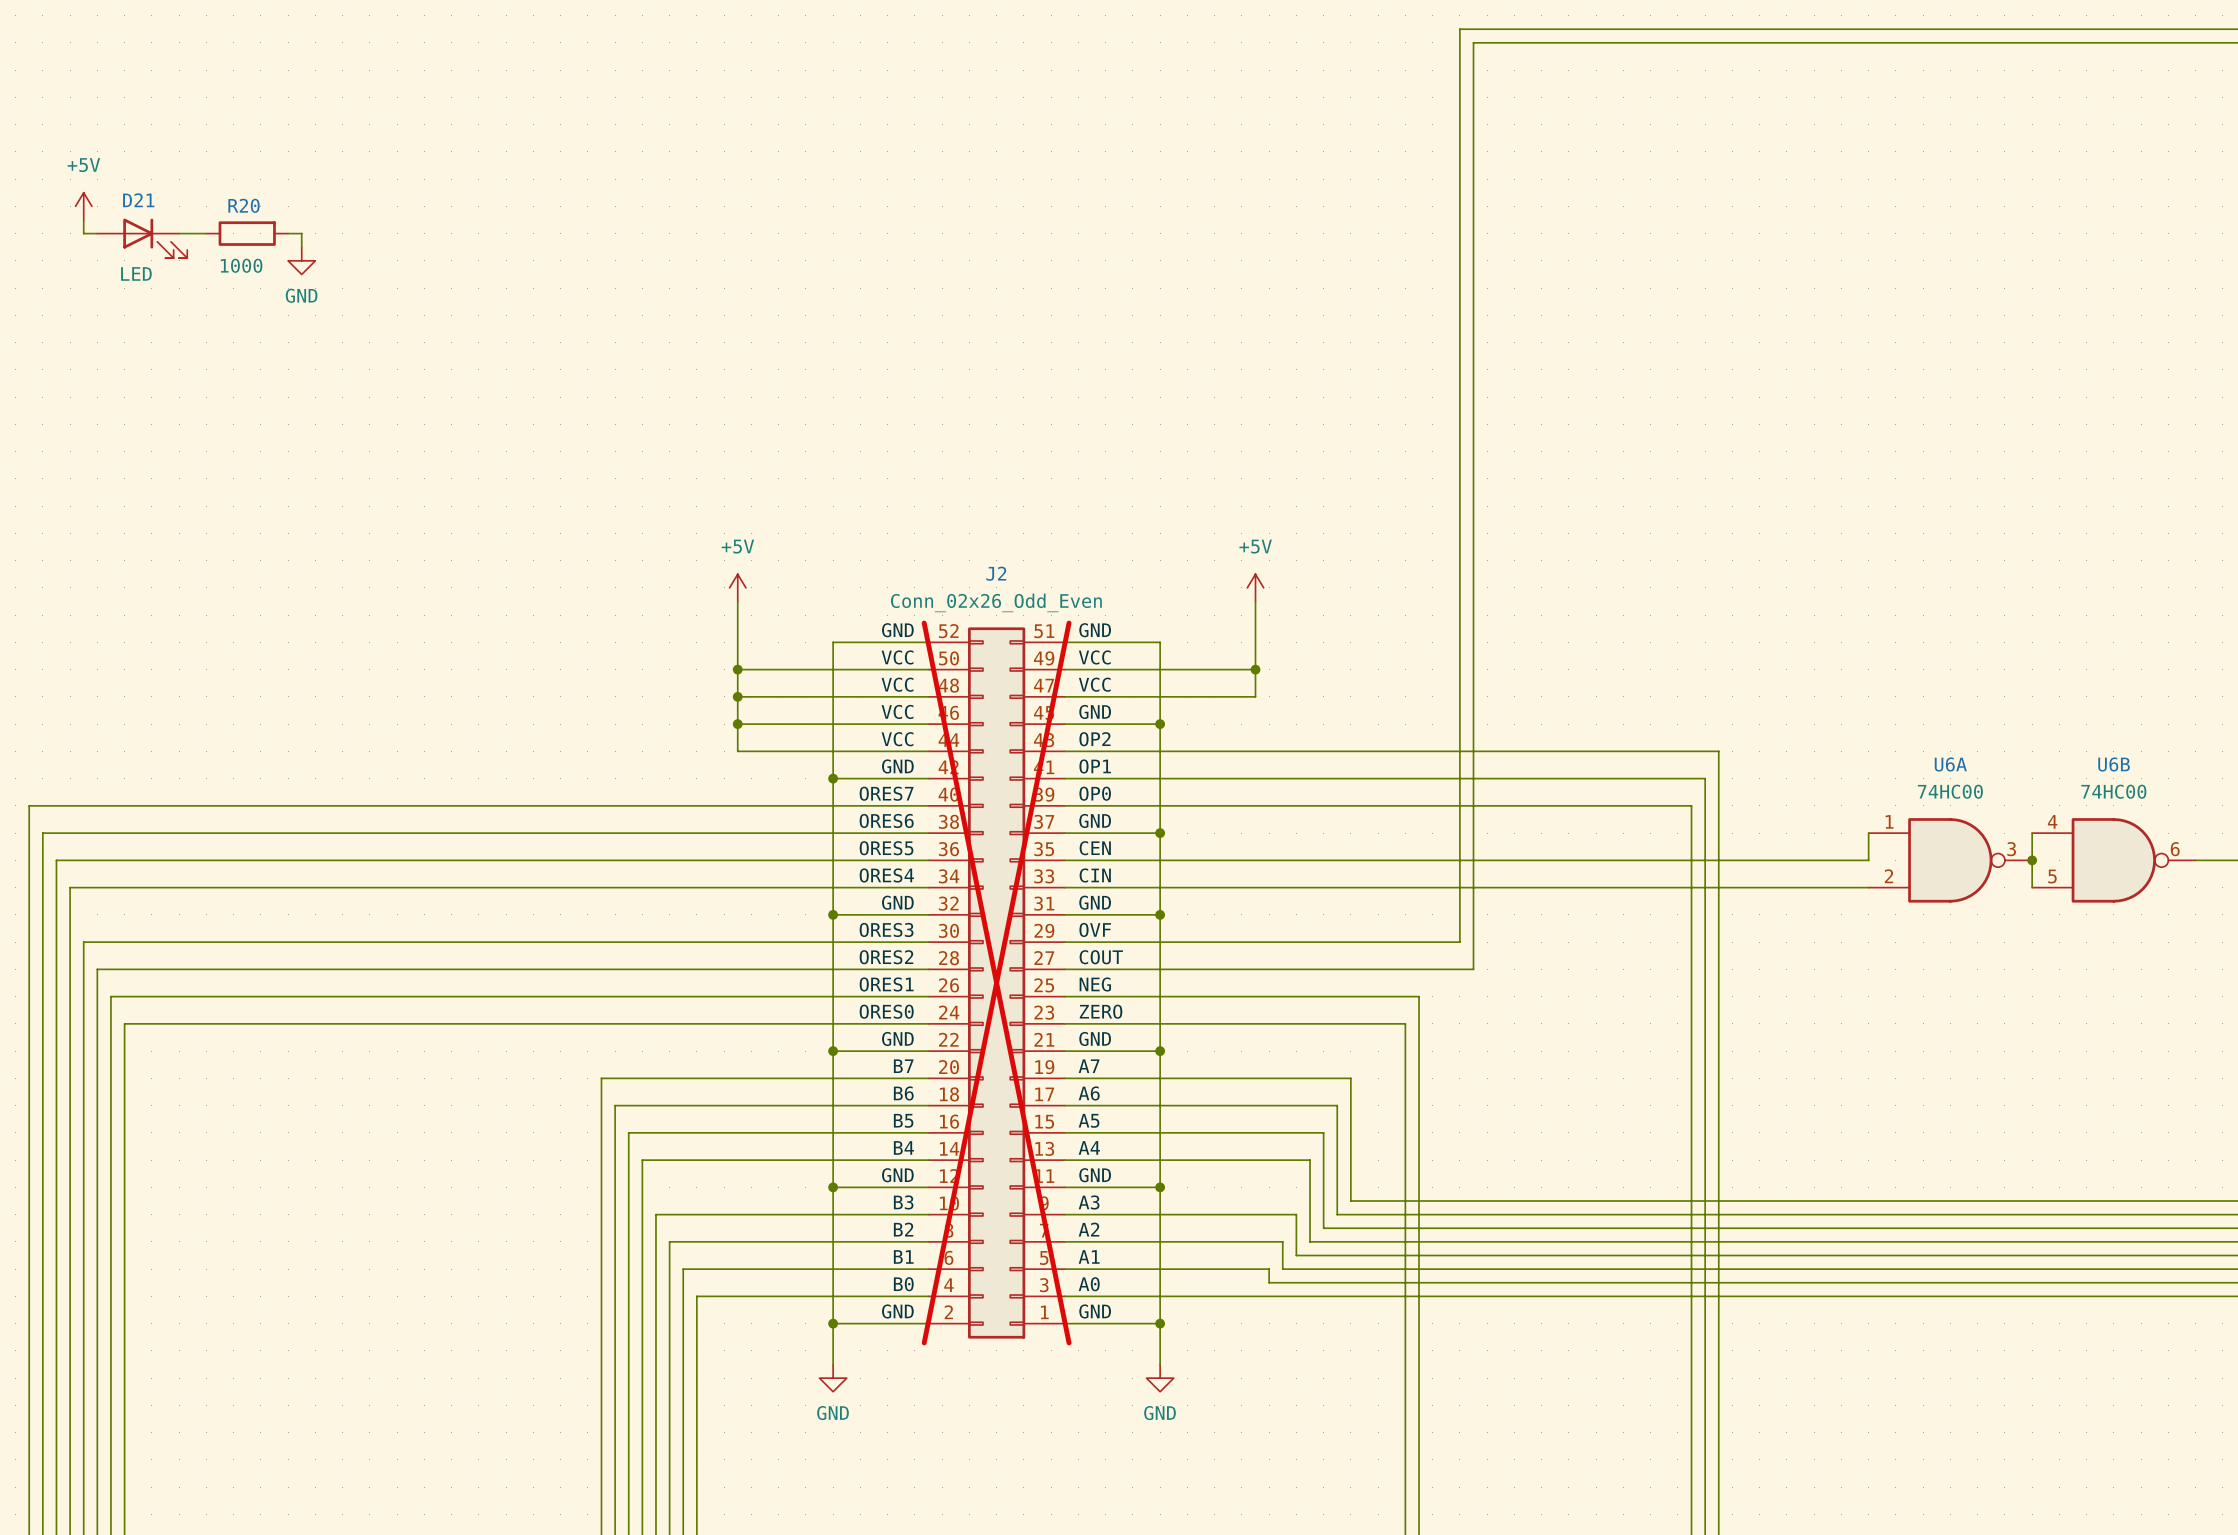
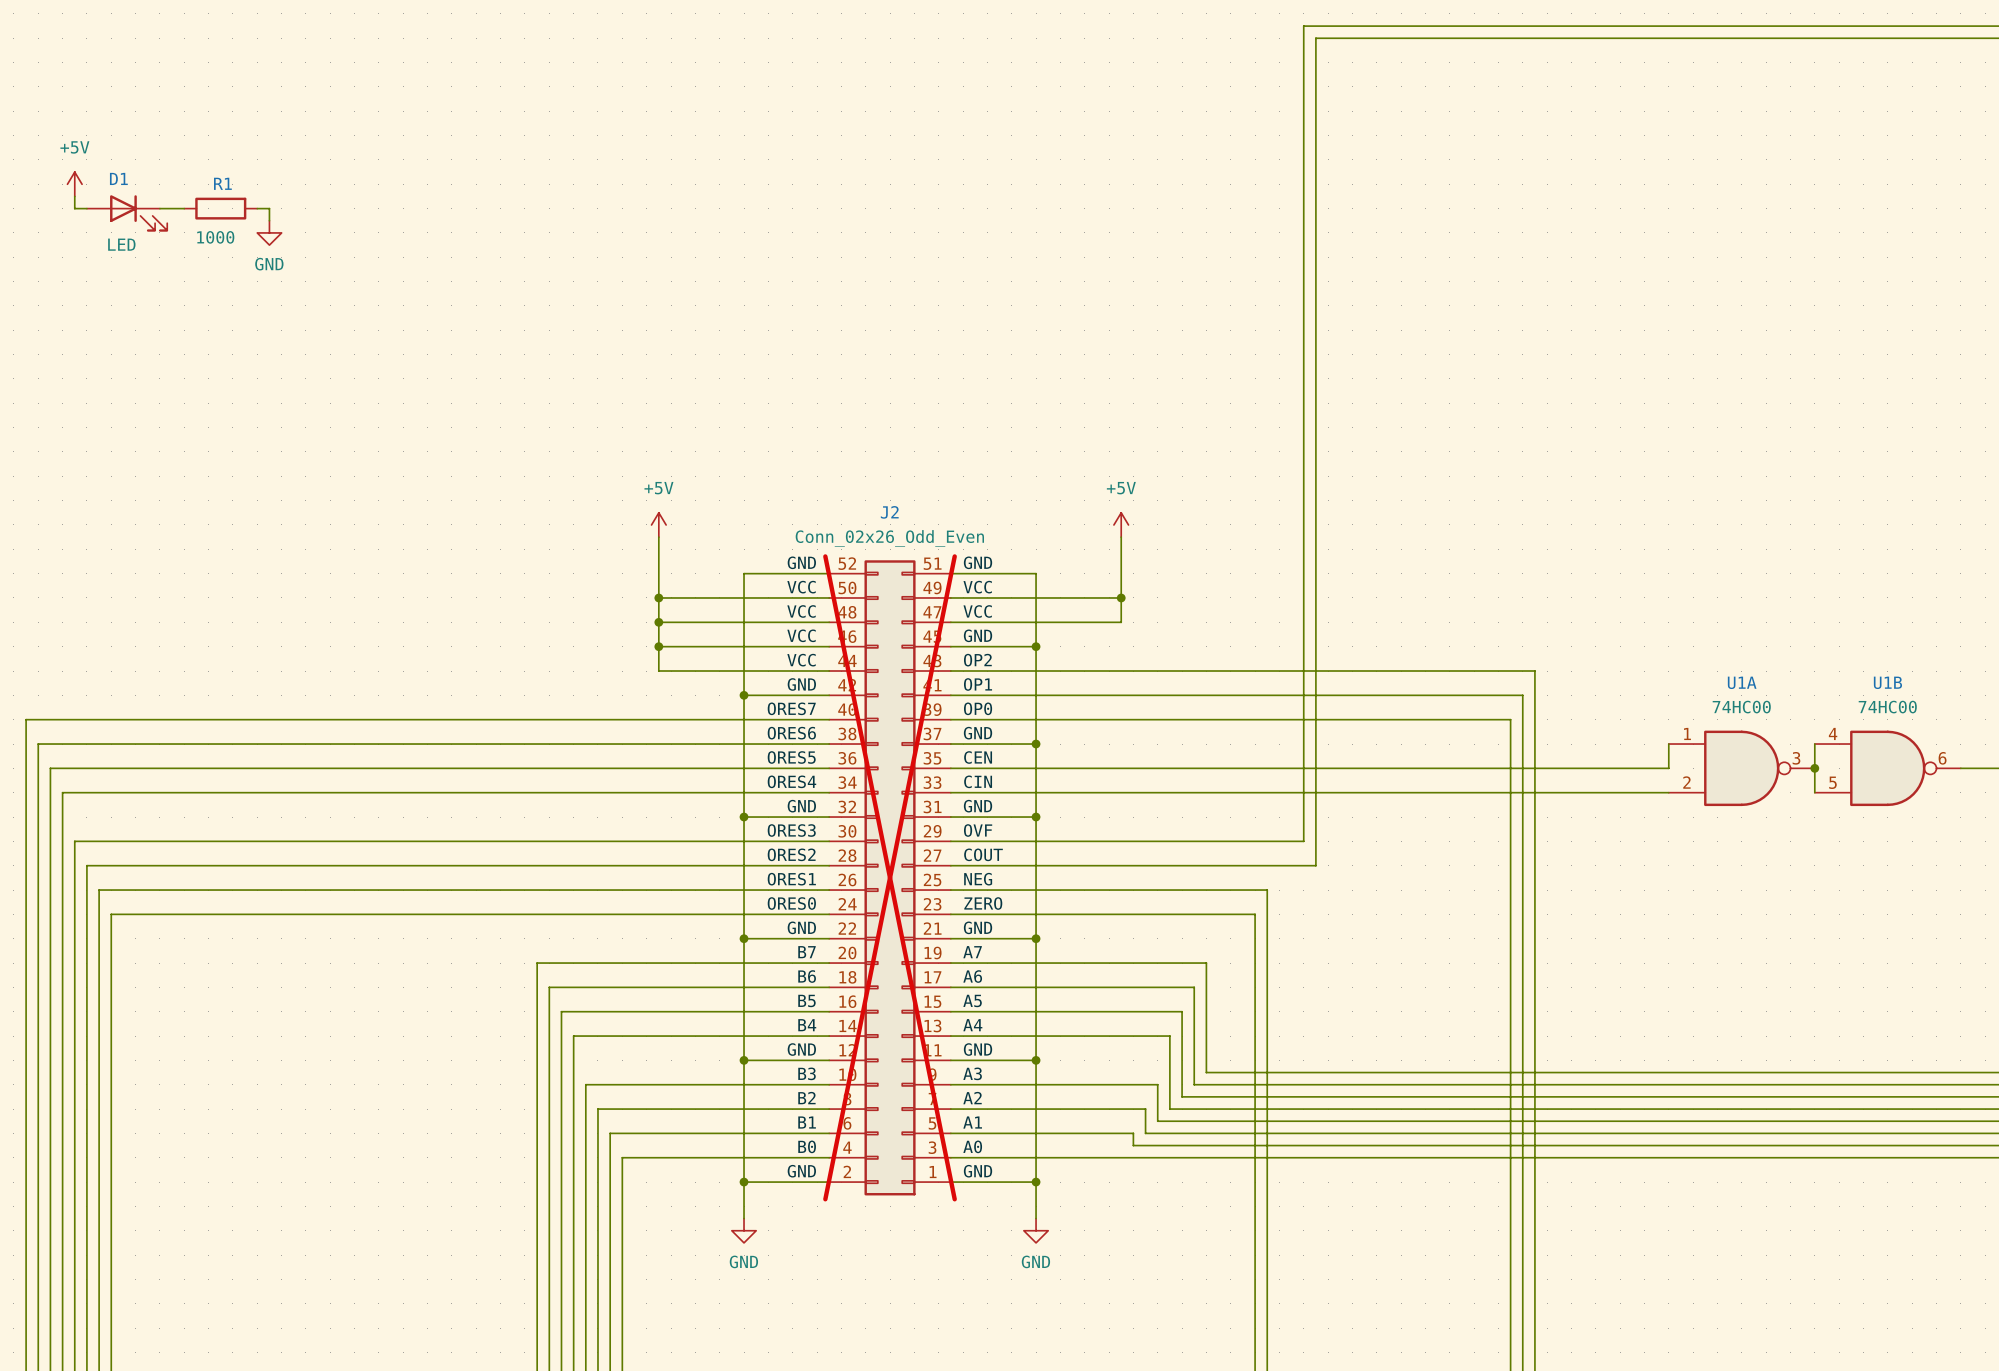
D21 name: D21 (138, 200) -> D1 (118, 178)
R20 name: R20 (244, 205) -> R1 (222, 183)
U6A name: U6A (1950, 764) -> U1A (1742, 682)
U6B name: U6B (2114, 764) -> U1B (1887, 682)

